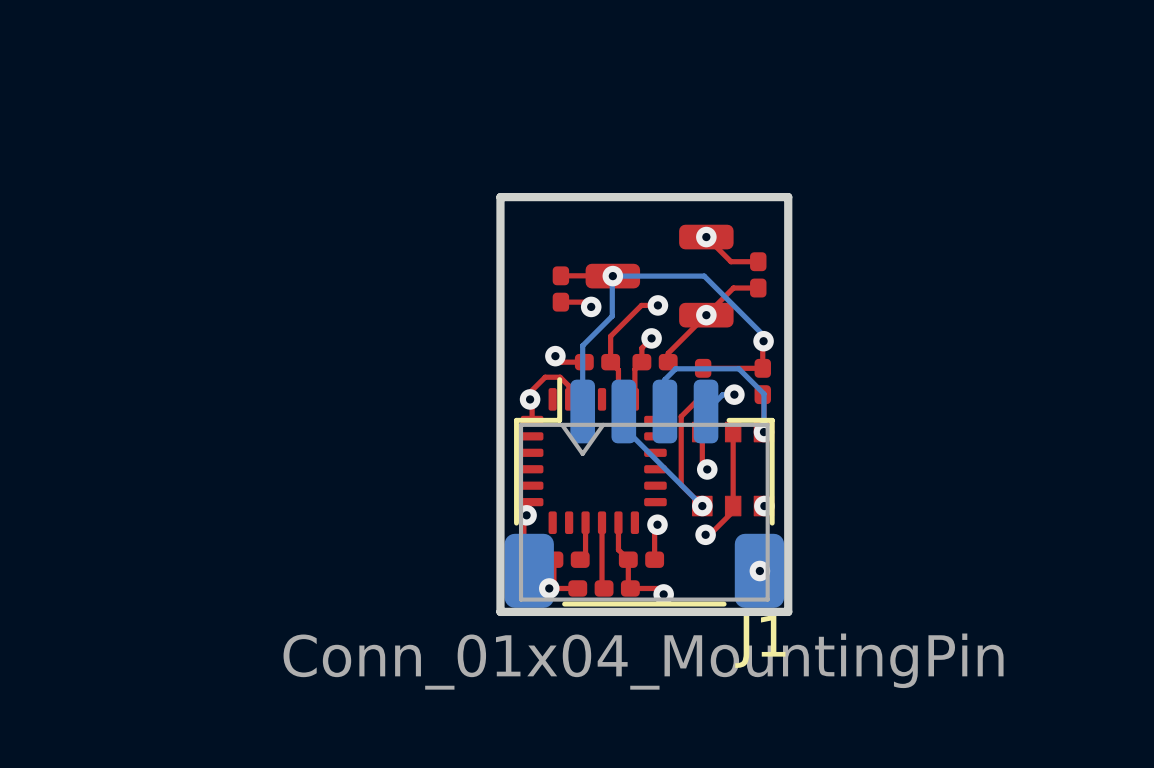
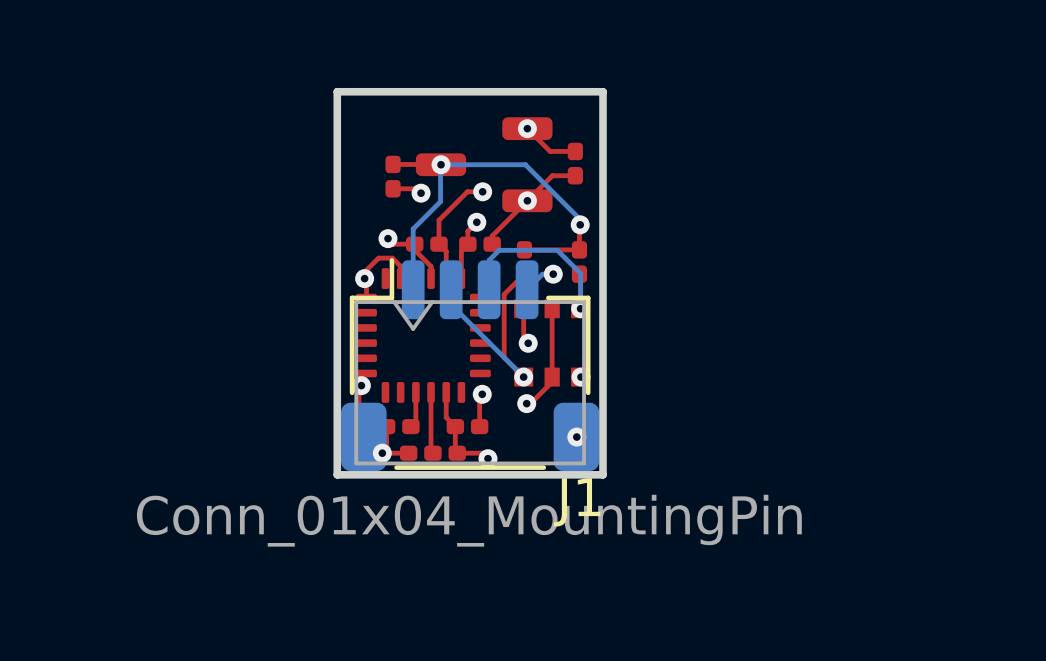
top track: none -> (414, 244) (414, 250) (431, 266) (431, 278)

